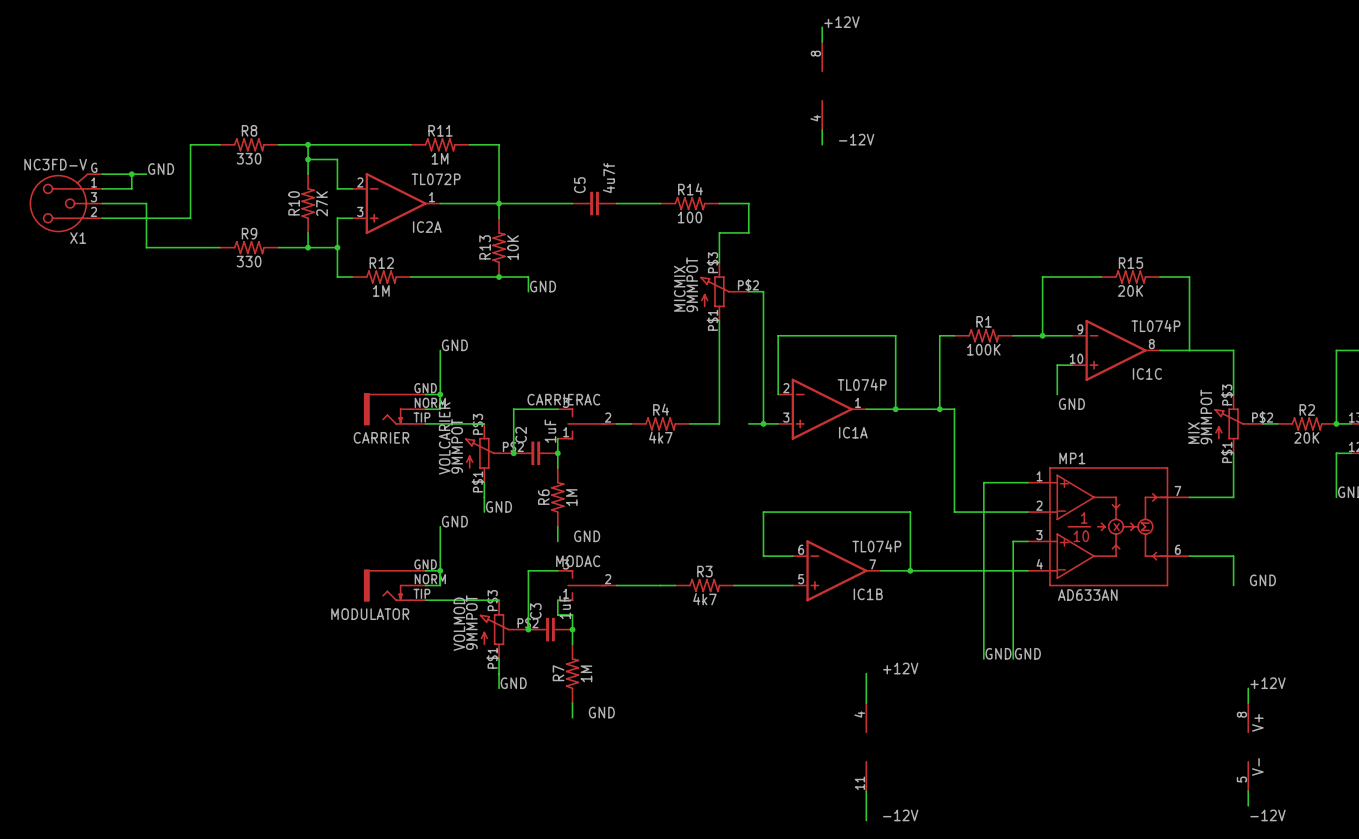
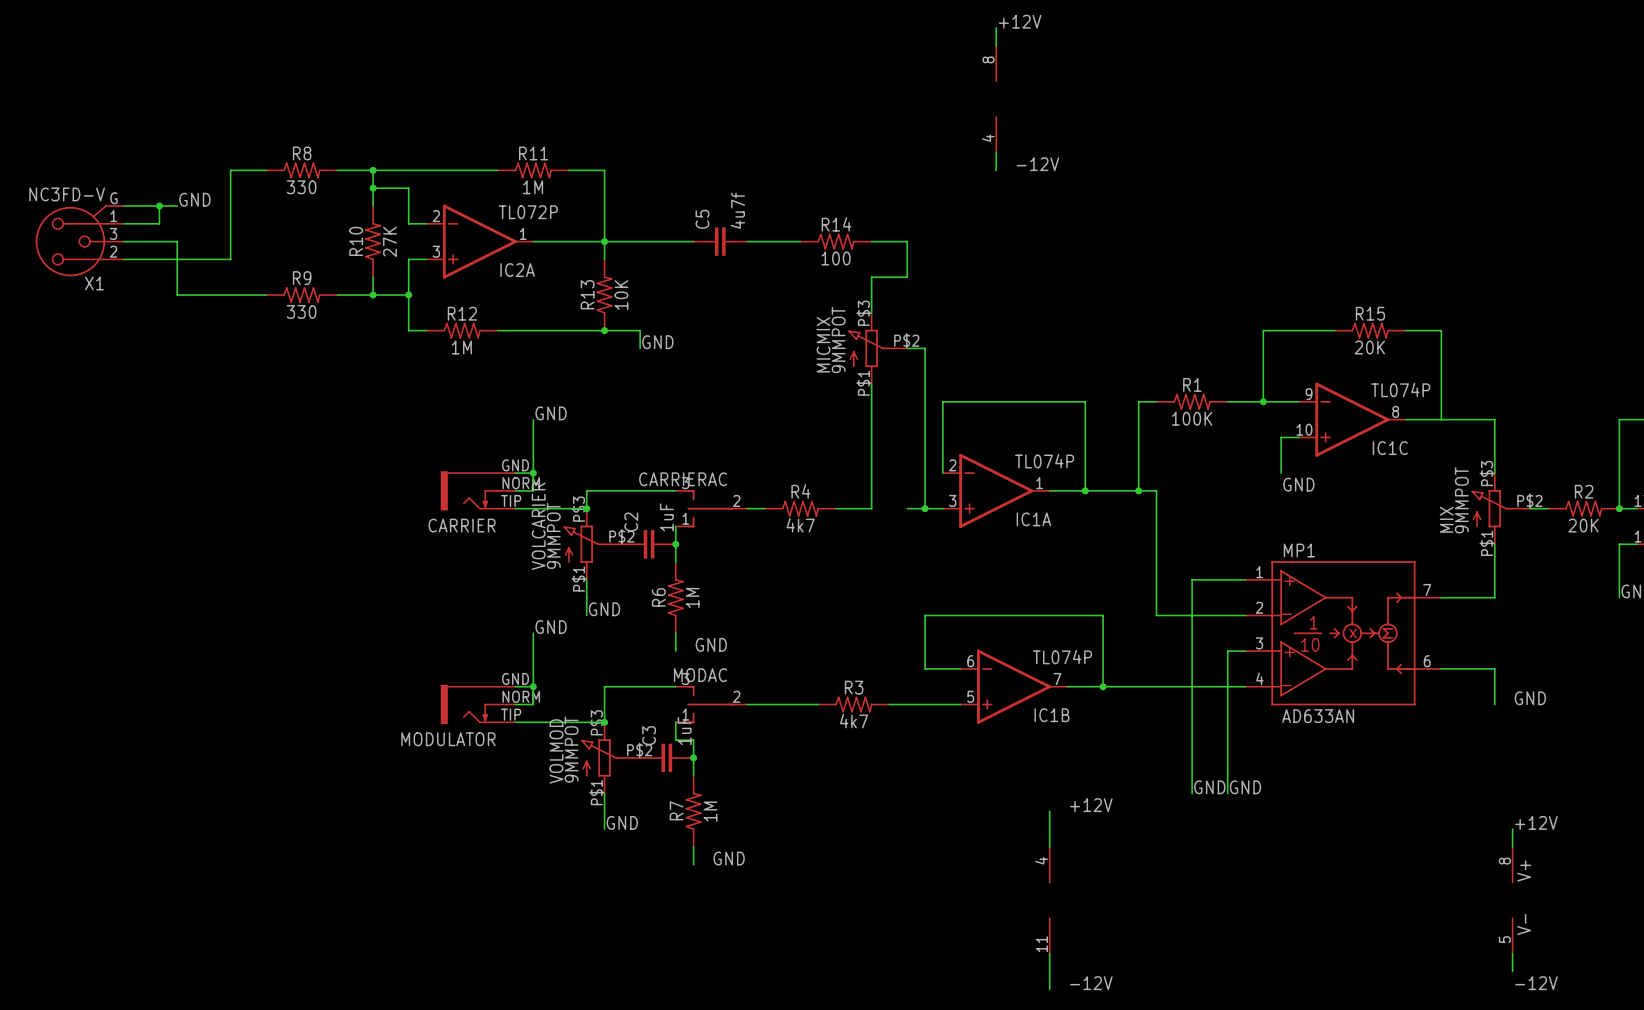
wire: (513, 409) (513, 453) -> (622, 490) (586, 490) (586, 508)
junction: none -> (586, 508)
junction: (513, 453) -> none
wire: (528, 570) (528, 629) -> (640, 686) (604, 686) (604, 722)
junction: none -> (604, 722)
junction: (528, 629) -> none

